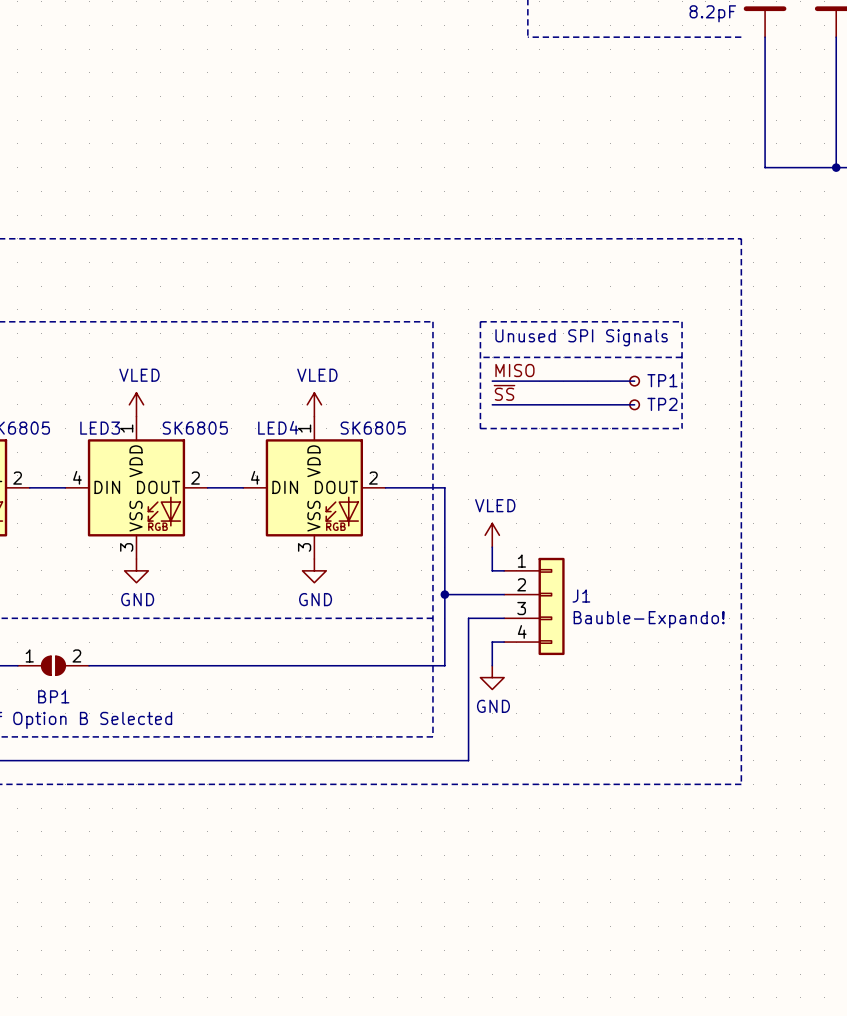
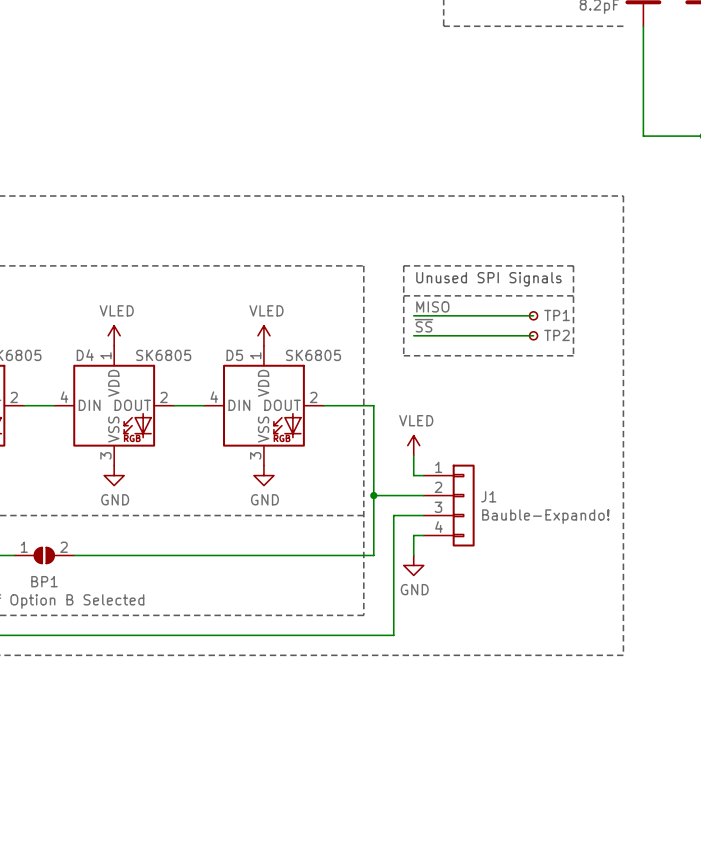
LED4 name: LED4 (278, 427) -> D5 (234, 355)
LED3 name: LED3 (100, 428) -> D4 (85, 355)

